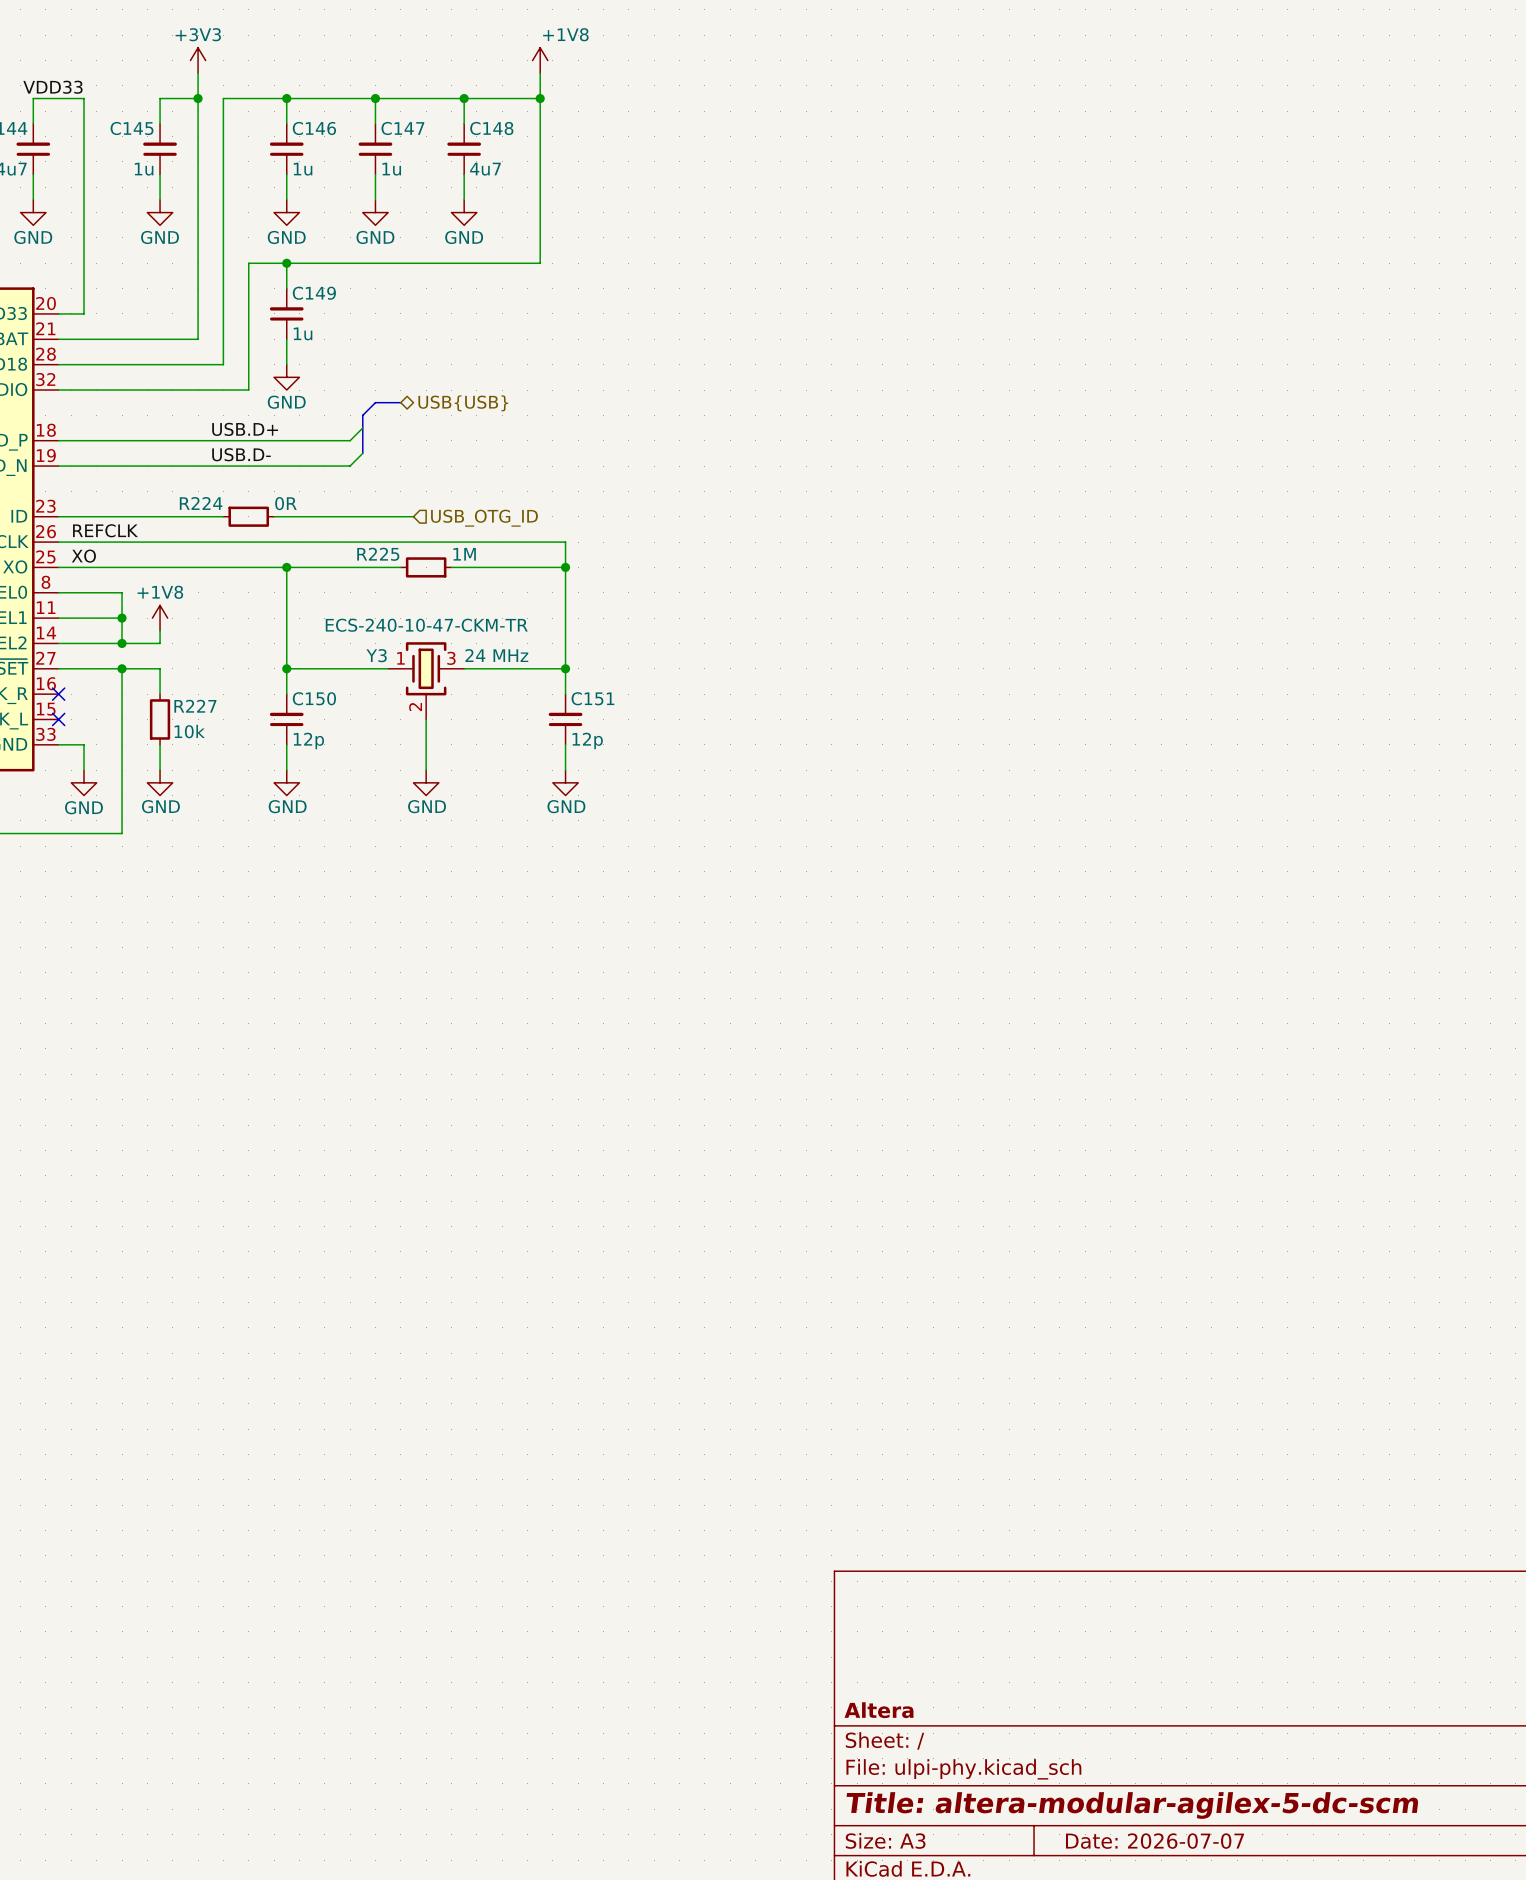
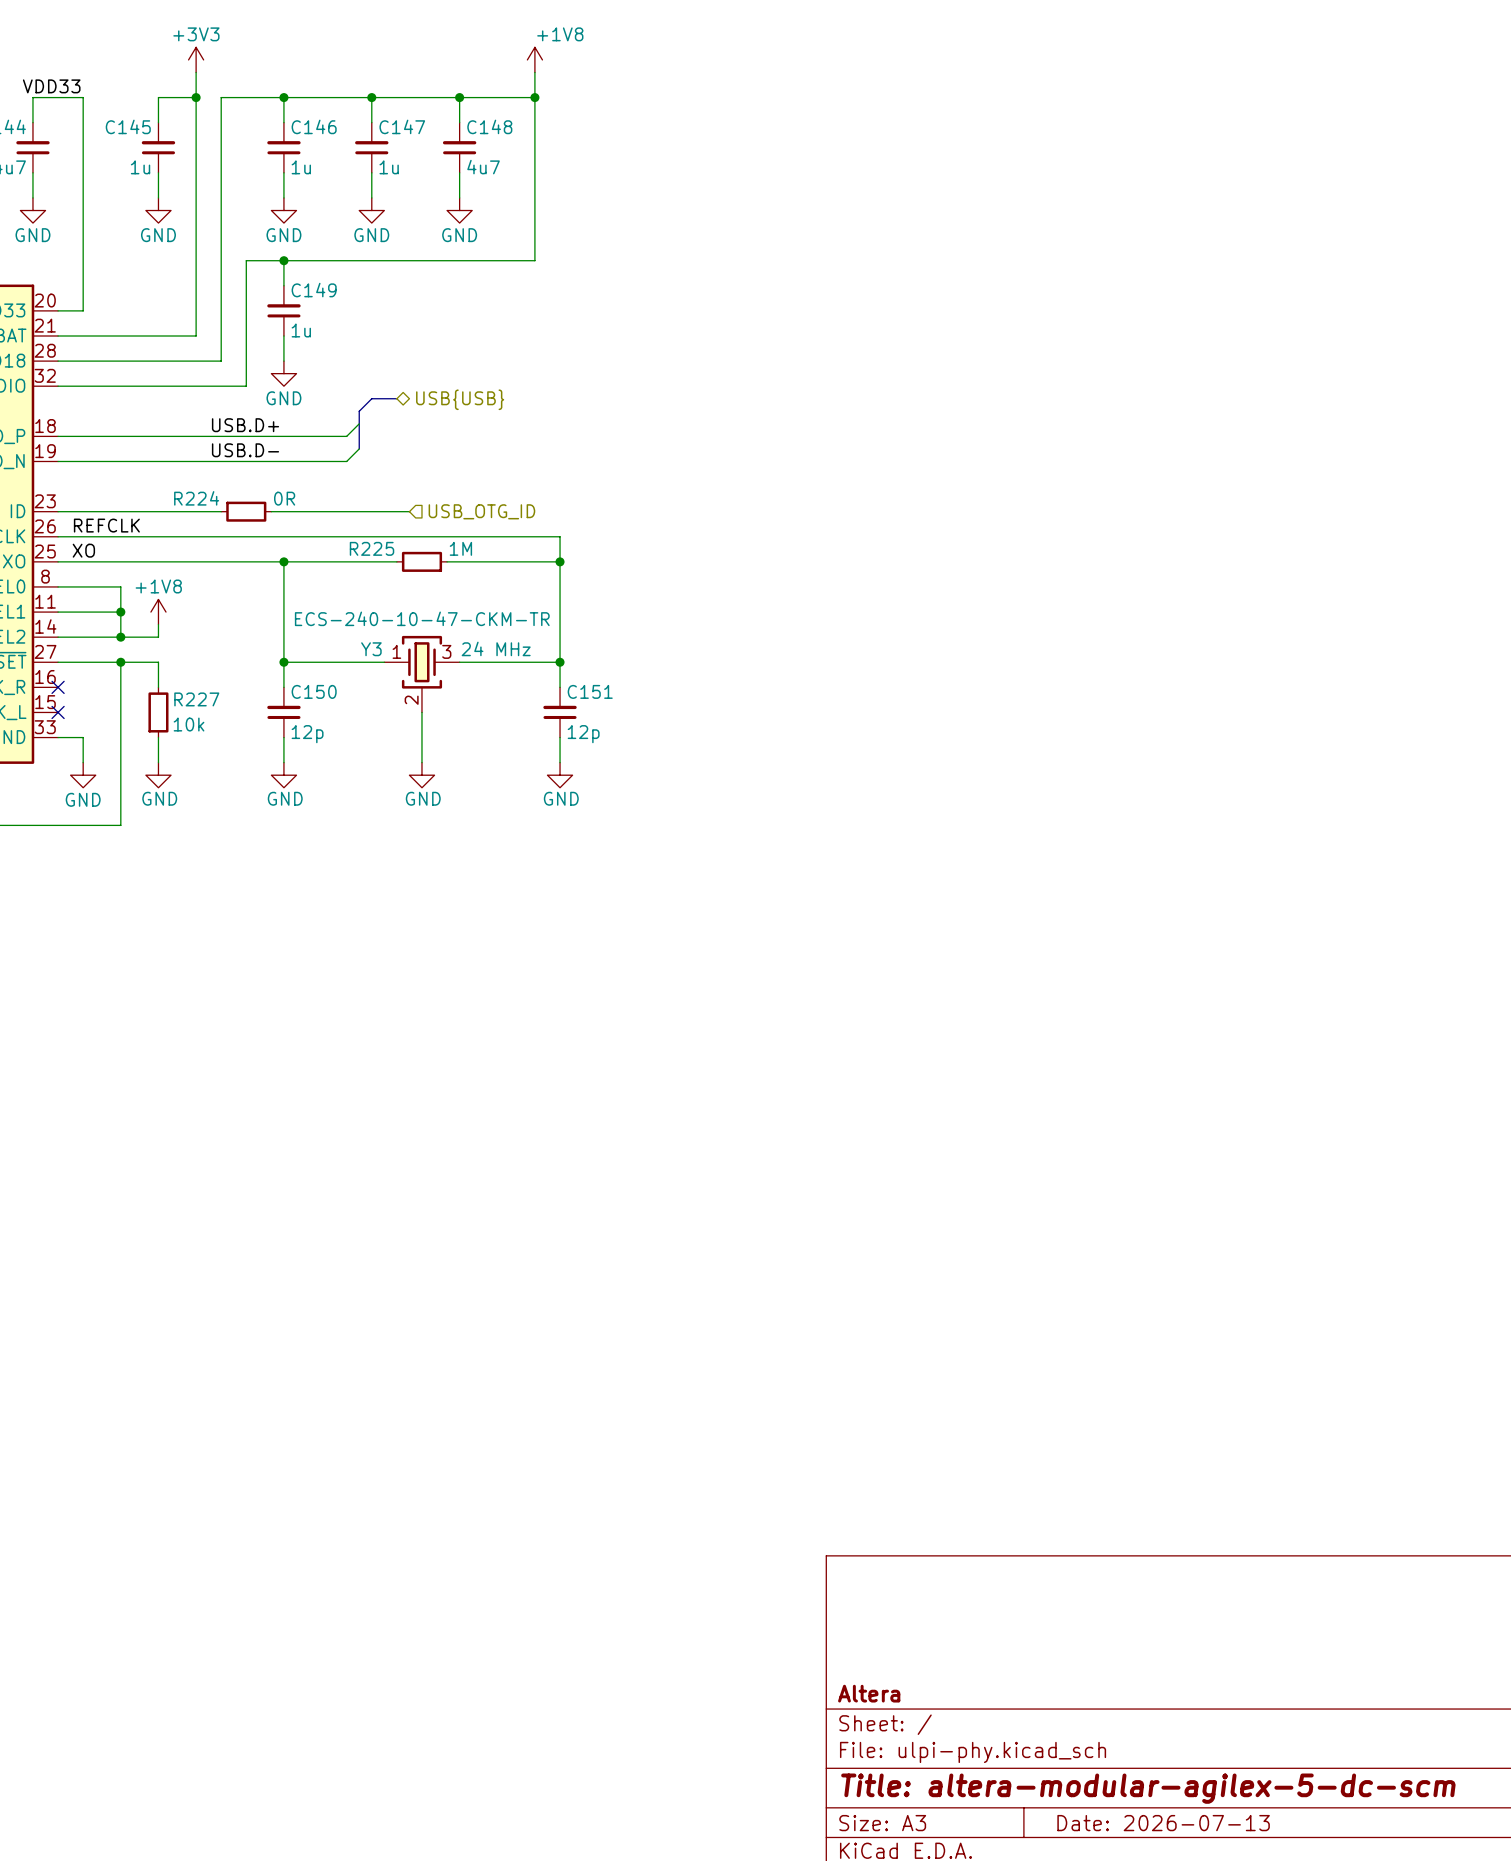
title block: Date: 2026-07-07 (1155, 1841) -> Date: 2026-07-13 (1163, 1823)

